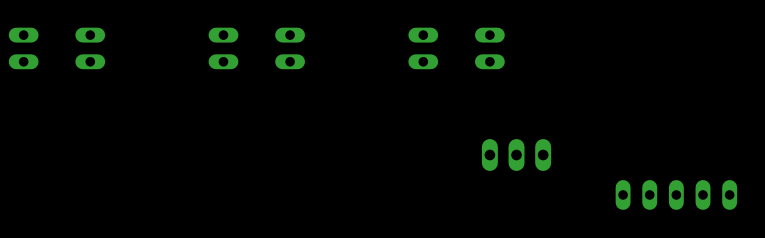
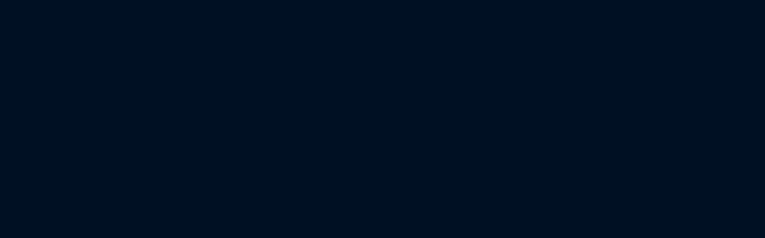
part: (23, 48) -> none
part: (90, 48) -> none
part: (223, 48) -> none
part: (290, 48) -> none
part: (423, 48) -> none
part: (489, 48) -> none
part: (516, 155) -> none
part: (676, 194) -> none

